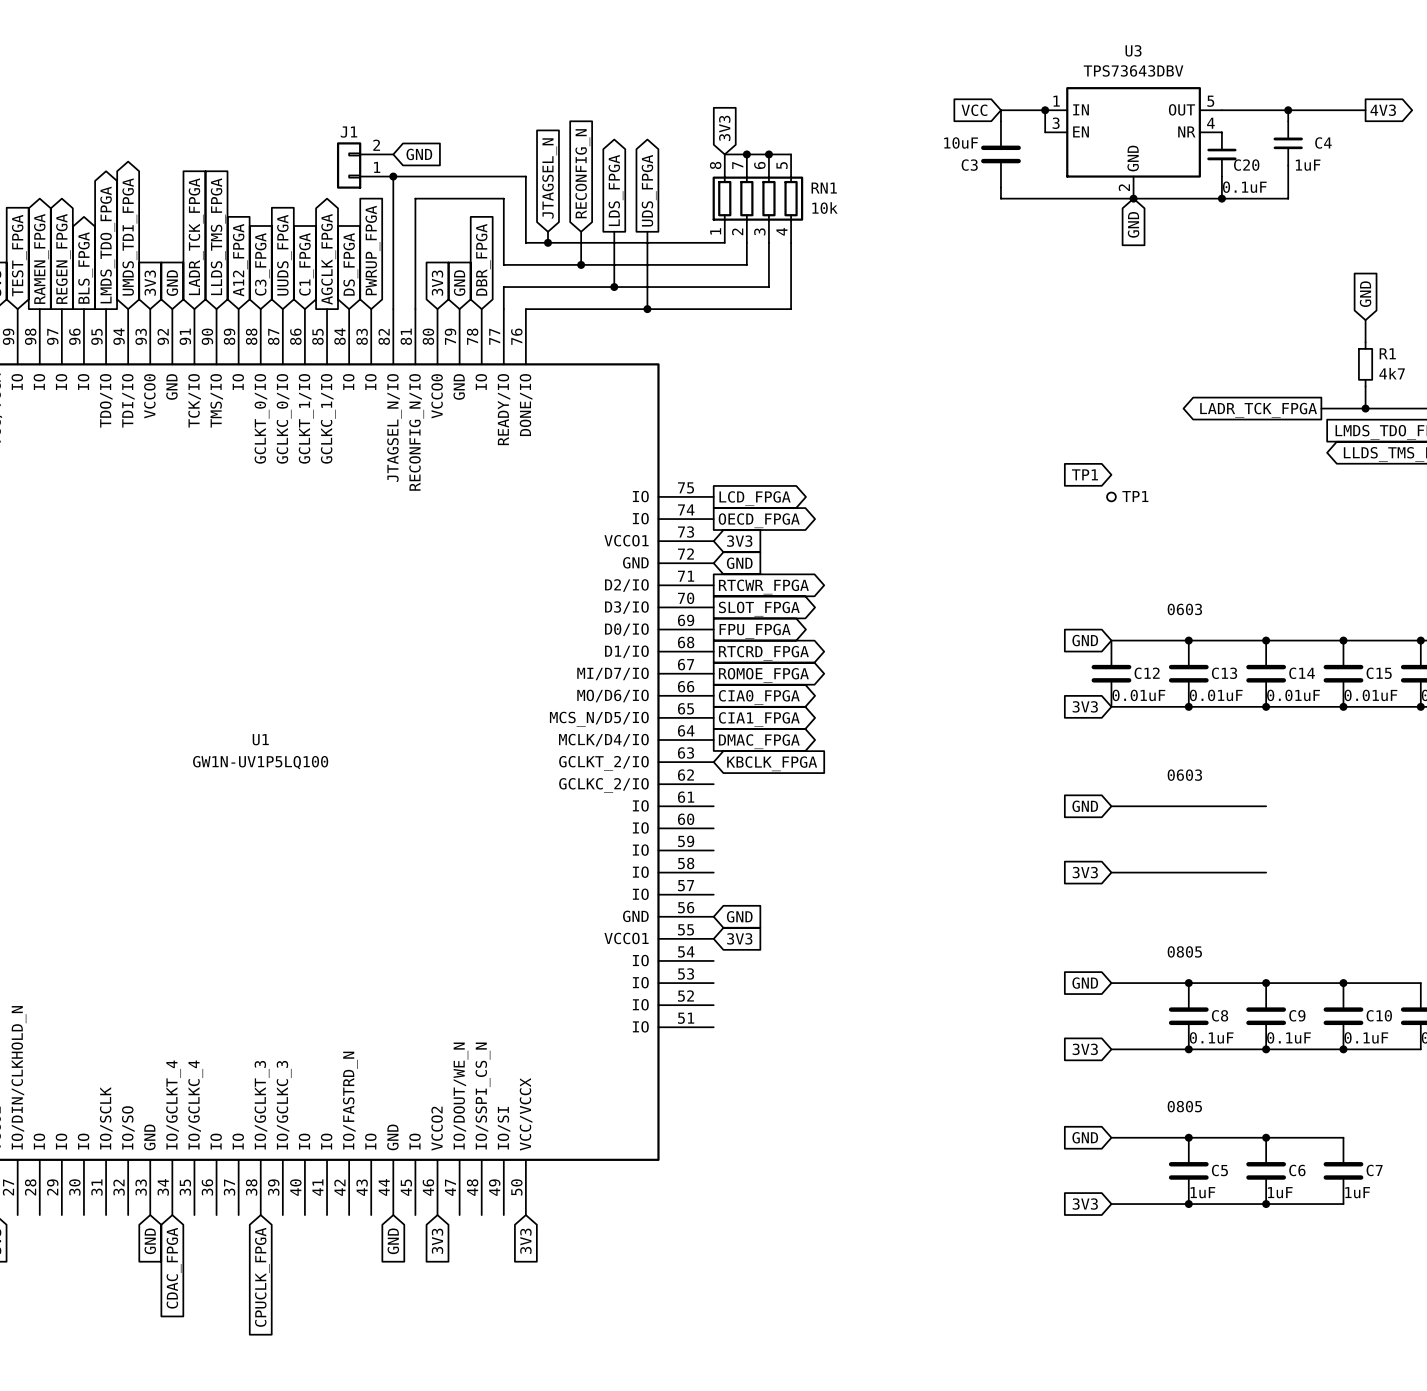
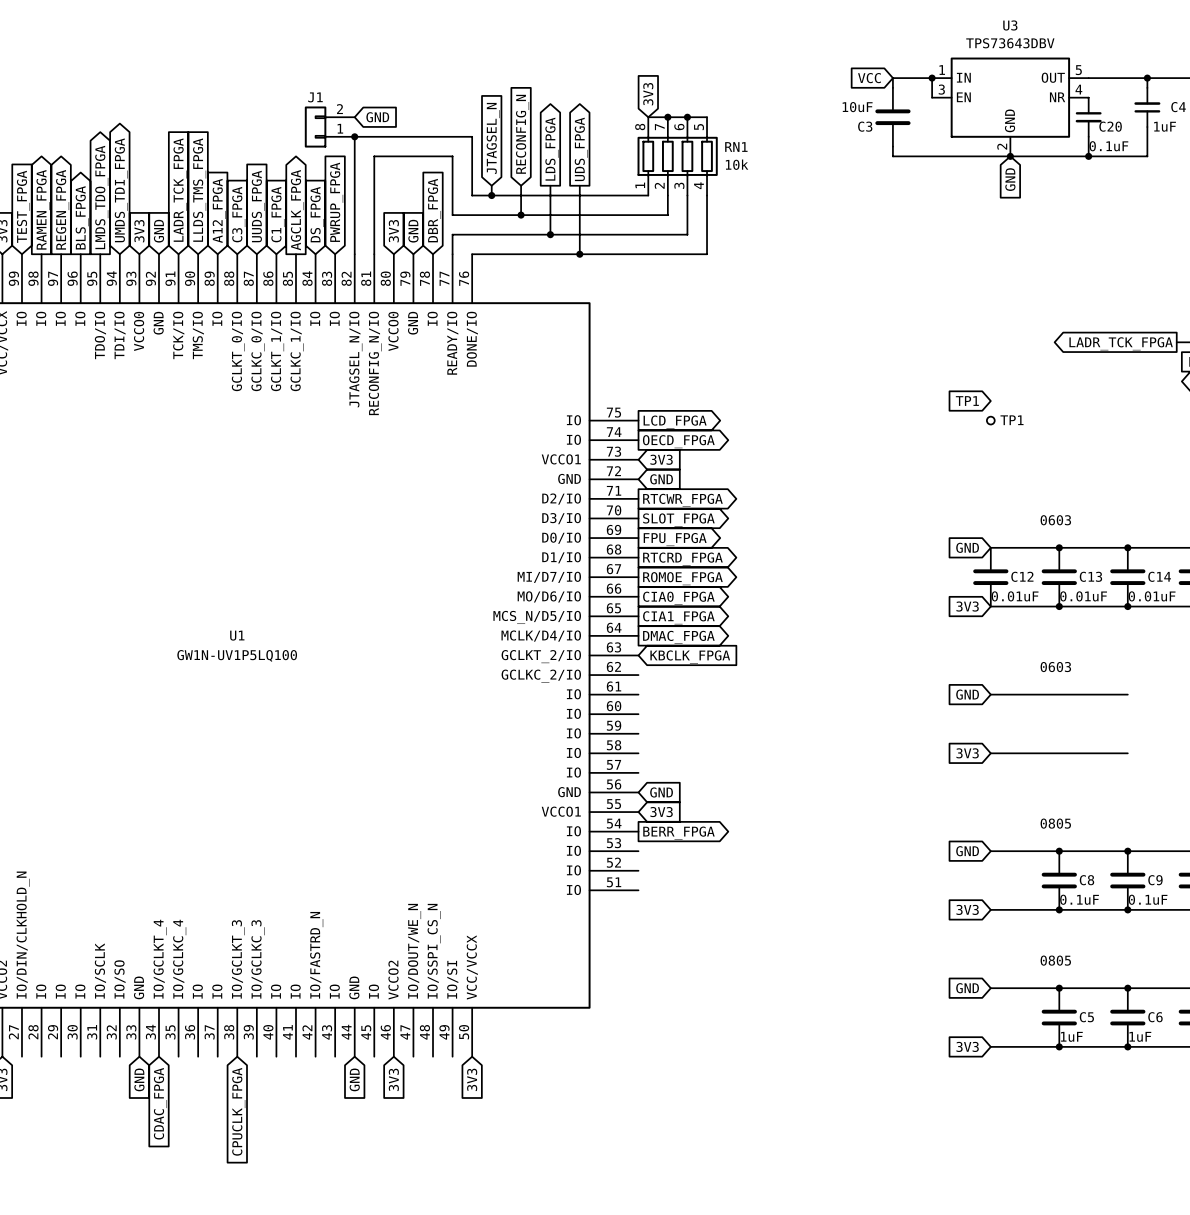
global label: none -> BERR_FPGA (678, 833)

